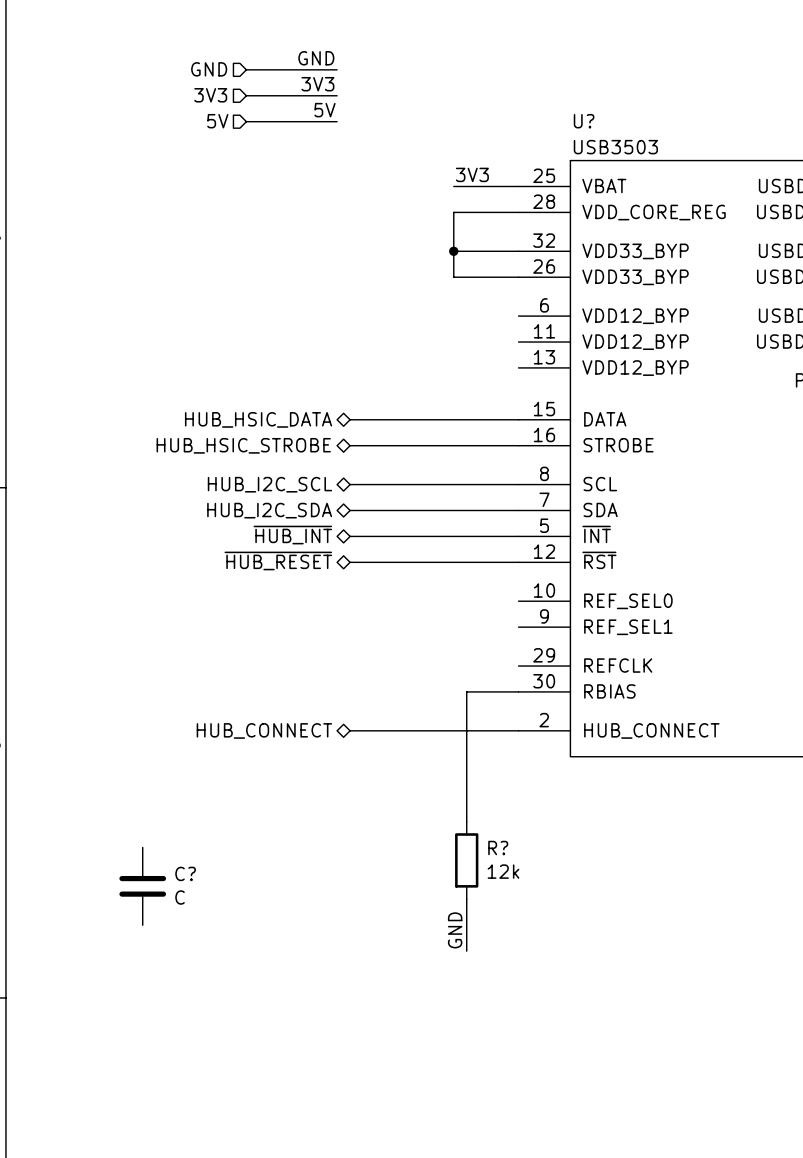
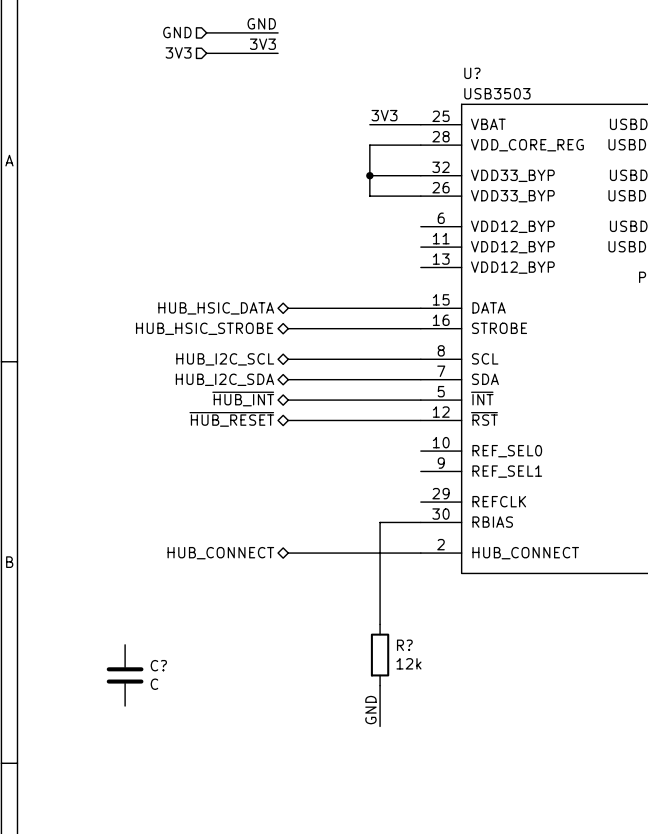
label: 5V (324, 110) -> none
hierarchical label: 5V (217, 121) -> none
wire: (246, 121) (337, 121) -> none

